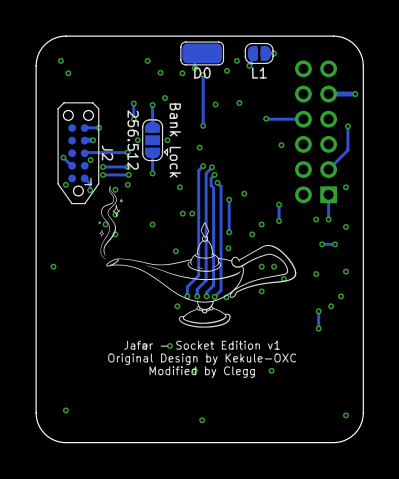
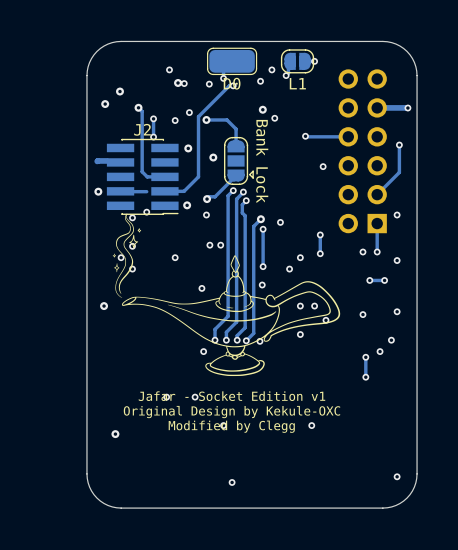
board edge: (105, 36) (65, 36) (54, 38) (42, 47) (38, 54) (36, 65) (36, 416) (42, 431) (54, 440) (65, 442) (105, 442) -> (121, 41) (108, 44) (96, 51) (89, 62) (86, 75) (87, 478) (89, 487) (96, 498) (108, 505) (121, 508)
via: (60, 60) -> none
via: none -> (178, 82)
via: (68, 73) -> none
track: (203, 74) (203, 125) -> (233, 85) (229, 85) (198, 116) (198, 176) (184, 191) (164, 191)
via: none -> (119, 91)
via: none -> (105, 104)
track: none -> (138, 107) (142, 111) (142, 171) (147, 176) (164, 176)
via: none -> (138, 107)
via: none -> (262, 109)
J2 footprint: [57, 102, 100, 205] -> [106, 138, 179, 215]
track: none -> (206, 119) (226, 119) (236, 129) (236, 146)
via: none -> (206, 119)
via: (215, 104) -> none
track: (152, 105) (152, 127) -> none
via: (203, 125) -> none
track: (99, 127) (84, 128) -> none
via: (99, 127) -> none
via: none -> (188, 148)
via: none -> (213, 157)
via: (93, 140) -> none
via: (137, 140) -> none
part: Bank Lock (155, 140) -> none
via: (167, 140) -> none
part: none -> Bank Lock (238, 160)
via: (199, 147) -> none
J2 name position: J2 (107, 152) -> J2 (142, 129)
track: (127, 152) (84, 153) -> none
via: (127, 152) -> none
track: (152, 153) (152, 173) -> none
track: none -> (236, 175) (215, 196) (209, 196) (207, 199)
track: (63, 157) (72, 165) -> none
via: (63, 157) -> none
via: (90, 160) -> none
via: none -> (98, 191)
via: (103, 166) -> none
via: (127, 166) -> none
via: (152, 173) -> none
via: none -> (207, 199)
via: (103, 174) -> none
track: (128, 174) (103, 174) -> none
via: (128, 174) -> none
track: (84, 178) (90, 183) (90, 190) -> none
via: none -> (187, 205)
track: (217, 182) (221, 186) (221, 197) -> (260, 219) (253, 226)
via: (217, 182) -> none
via: (65, 184) -> none
via: (90, 190) -> none
via: none -> (260, 219)
via: (53, 266) -> none
via: none -> (104, 306)
via: none -> (115, 434)
via: (65, 410) -> none

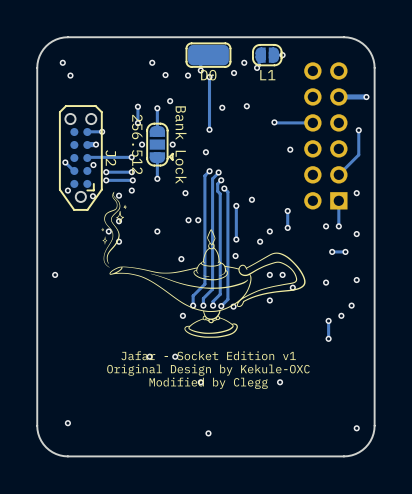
board edge: (121, 41) (108, 44) (96, 51) (89, 62) (86, 75) (87, 478) (89, 487) (96, 498) (108, 505) (121, 508) -> (108, 37) (67, 37) (56, 39) (43, 49) (39, 56) (37, 67) (37, 429) (43, 444) (56, 454) (67, 456) (108, 456)
via: none -> (62, 62)
via: (178, 82) -> none
via: none -> (70, 75)
track: (233, 85) (229, 85) (198, 116) (198, 176) (184, 191) (164, 191) -> (209, 77) (209, 129)
via: (119, 91) -> none
via: (105, 104) -> none
track: (138, 107) (142, 111) (142, 171) (147, 176) (164, 176) -> none
via: (138, 107) -> none
via: (262, 109) -> none
track: (206, 119) (226, 119) (236, 129) (236, 146) -> none
via: (206, 119) -> none
via: none -> (222, 107)
track: none -> (157, 108) (157, 131)
J2 name position: J2 (142, 129) -> J2 (110, 158)
J2 footprint: [106, 138, 179, 215] -> [59, 105, 103, 211]
via: none -> (209, 129)
track: none -> (102, 131) (87, 132)
via: none -> (102, 131)
via: (188, 148) -> none
via: (213, 157) -> none
via: none -> (96, 144)
via: none -> (142, 144)
part: none -> Bank Lock (159, 144)
via: none -> (172, 144)
part: Bank Lock (238, 160) -> none
via: none -> (205, 152)
track: none -> (131, 157) (87, 157)
via: none -> (131, 157)
track: none -> (157, 157) (157, 178)
track: (236, 175) (215, 196) (209, 196) (207, 199) -> none
track: none -> (65, 162) (74, 170)
via: none -> (65, 162)
via: none -> (93, 165)
via: (98, 191) -> none
via: none -> (106, 172)
via: none -> (131, 172)
via: none -> (157, 178)
via: (207, 199) -> none
via: none -> (106, 180)
track: none -> (132, 180) (106, 180)
via: none -> (132, 180)
via: (187, 205) -> none
via: none -> (224, 188)
via: none -> (67, 190)
via: none -> (92, 196)
track: (260, 219) (253, 226) -> (224, 188) (227, 192) (227, 203)
via: (260, 219) -> none
via: none -> (55, 274)
via: (104, 306) -> none
via: (115, 434) -> none
via: none -> (67, 423)

